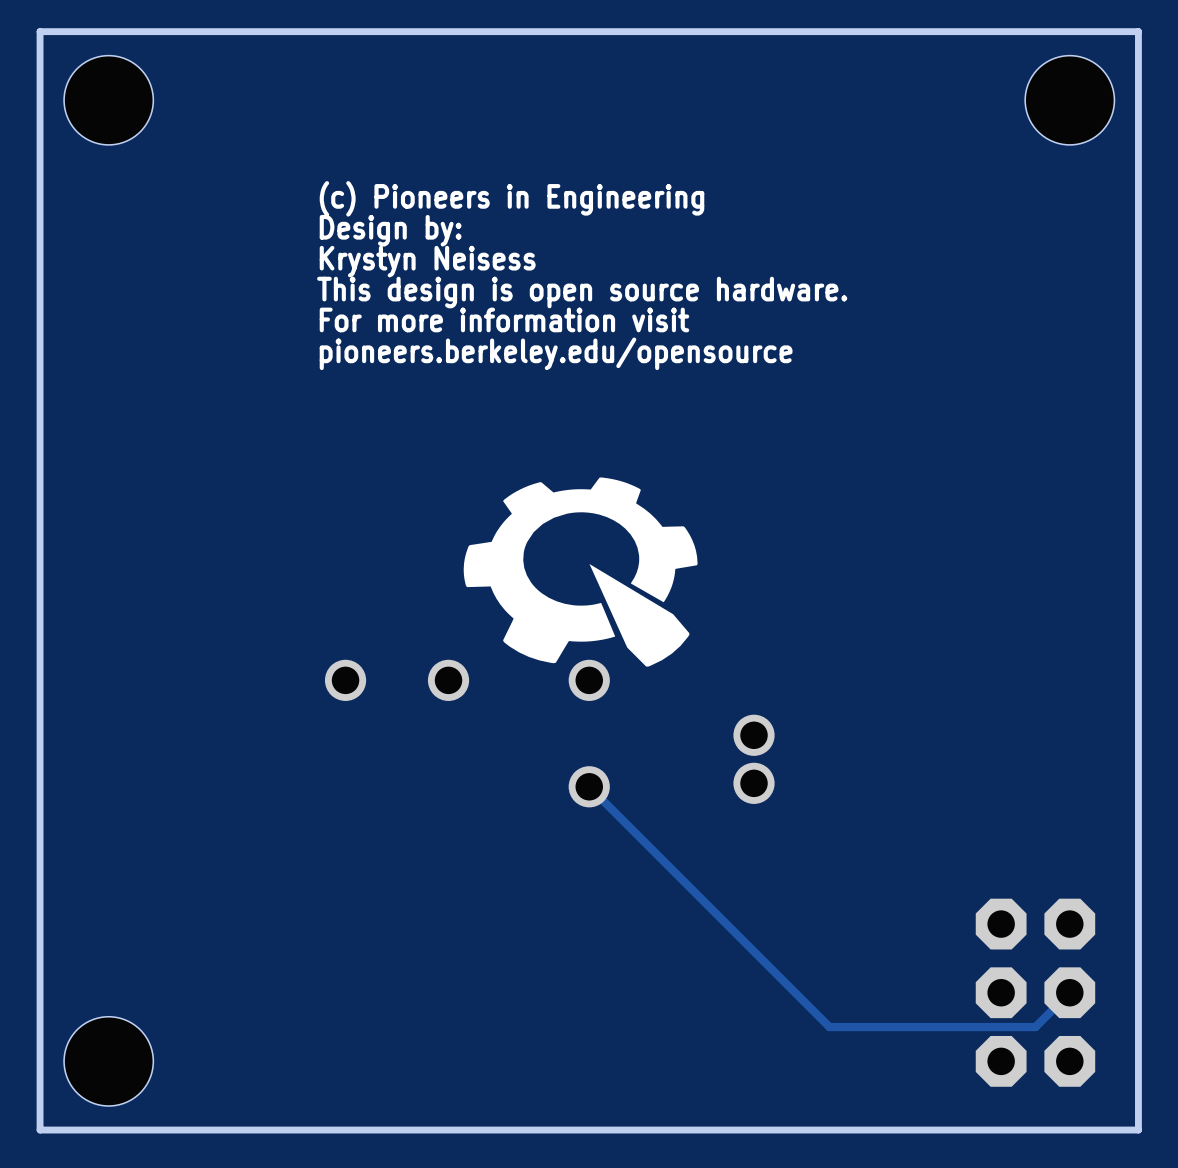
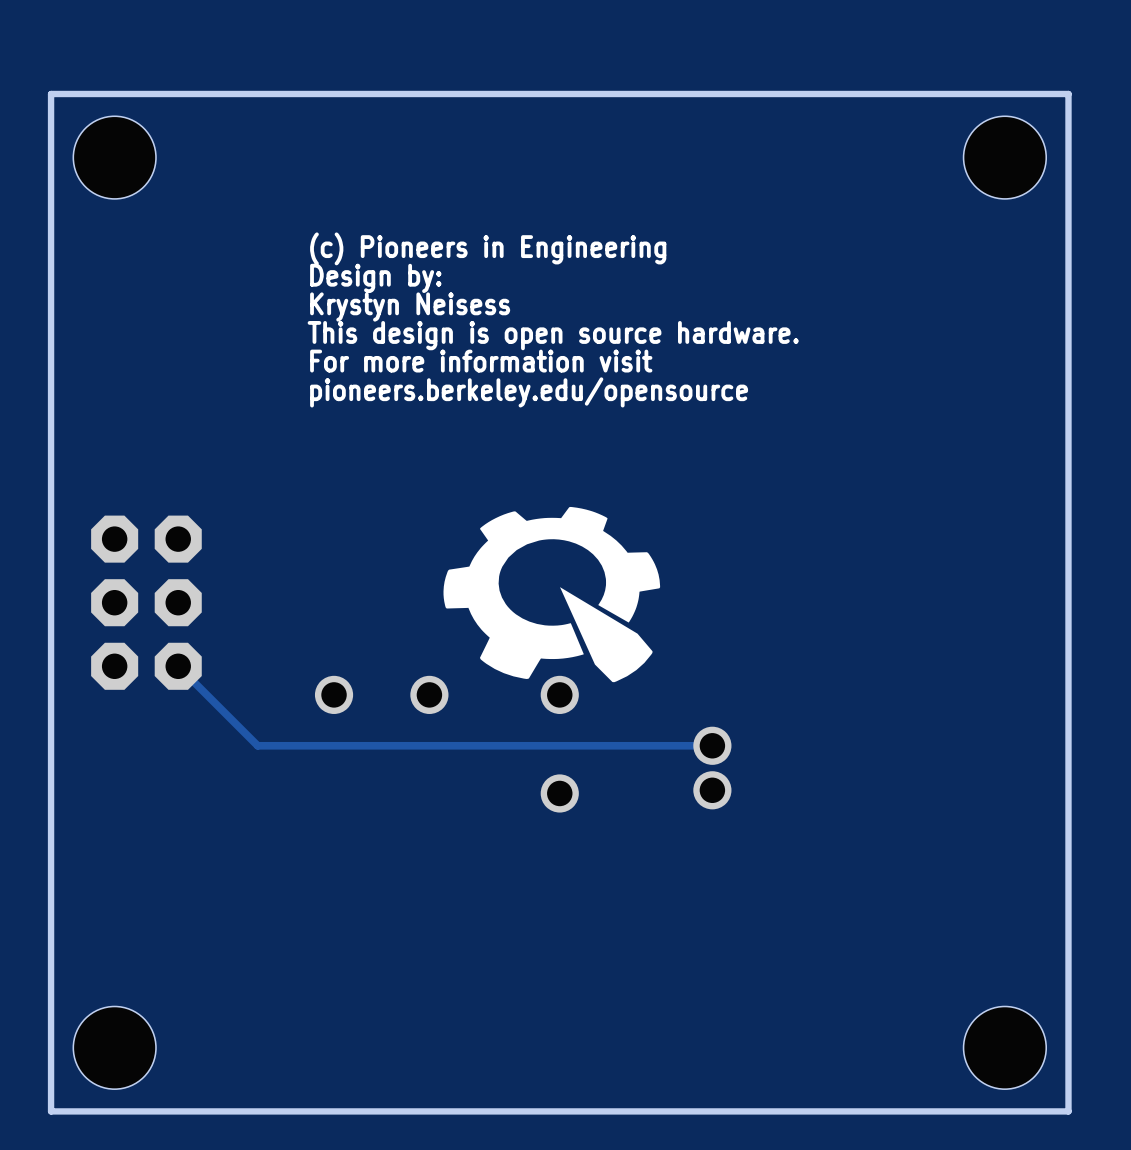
part: none -> (146, 602)
track: none -> (178, 666) (257, 745) (712, 745)
track: (589, 786) (829, 1027) (1035, 1027) (1069, 992) -> none
part: (1035, 992) -> none
part: none -> (1004, 1047)

